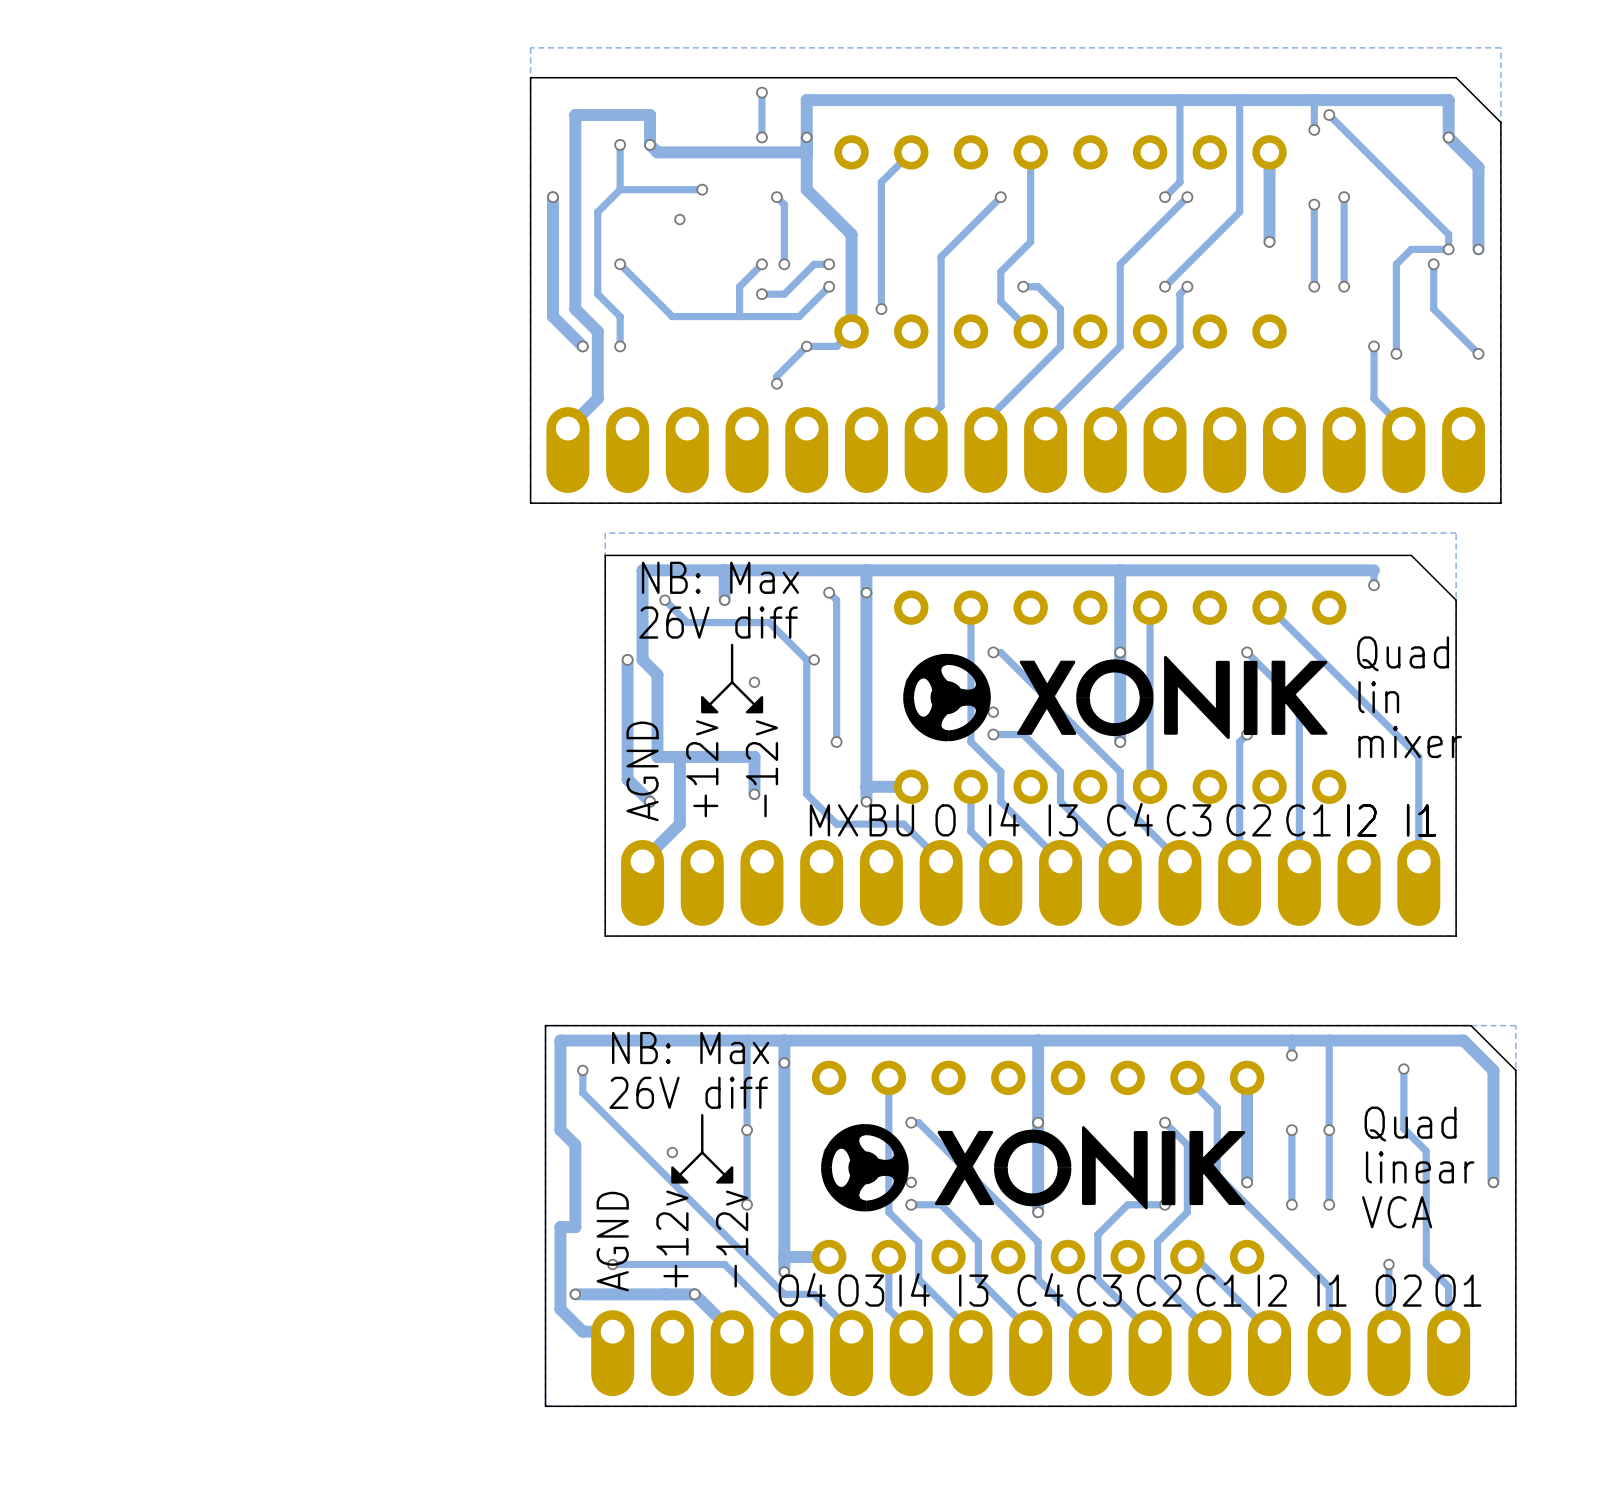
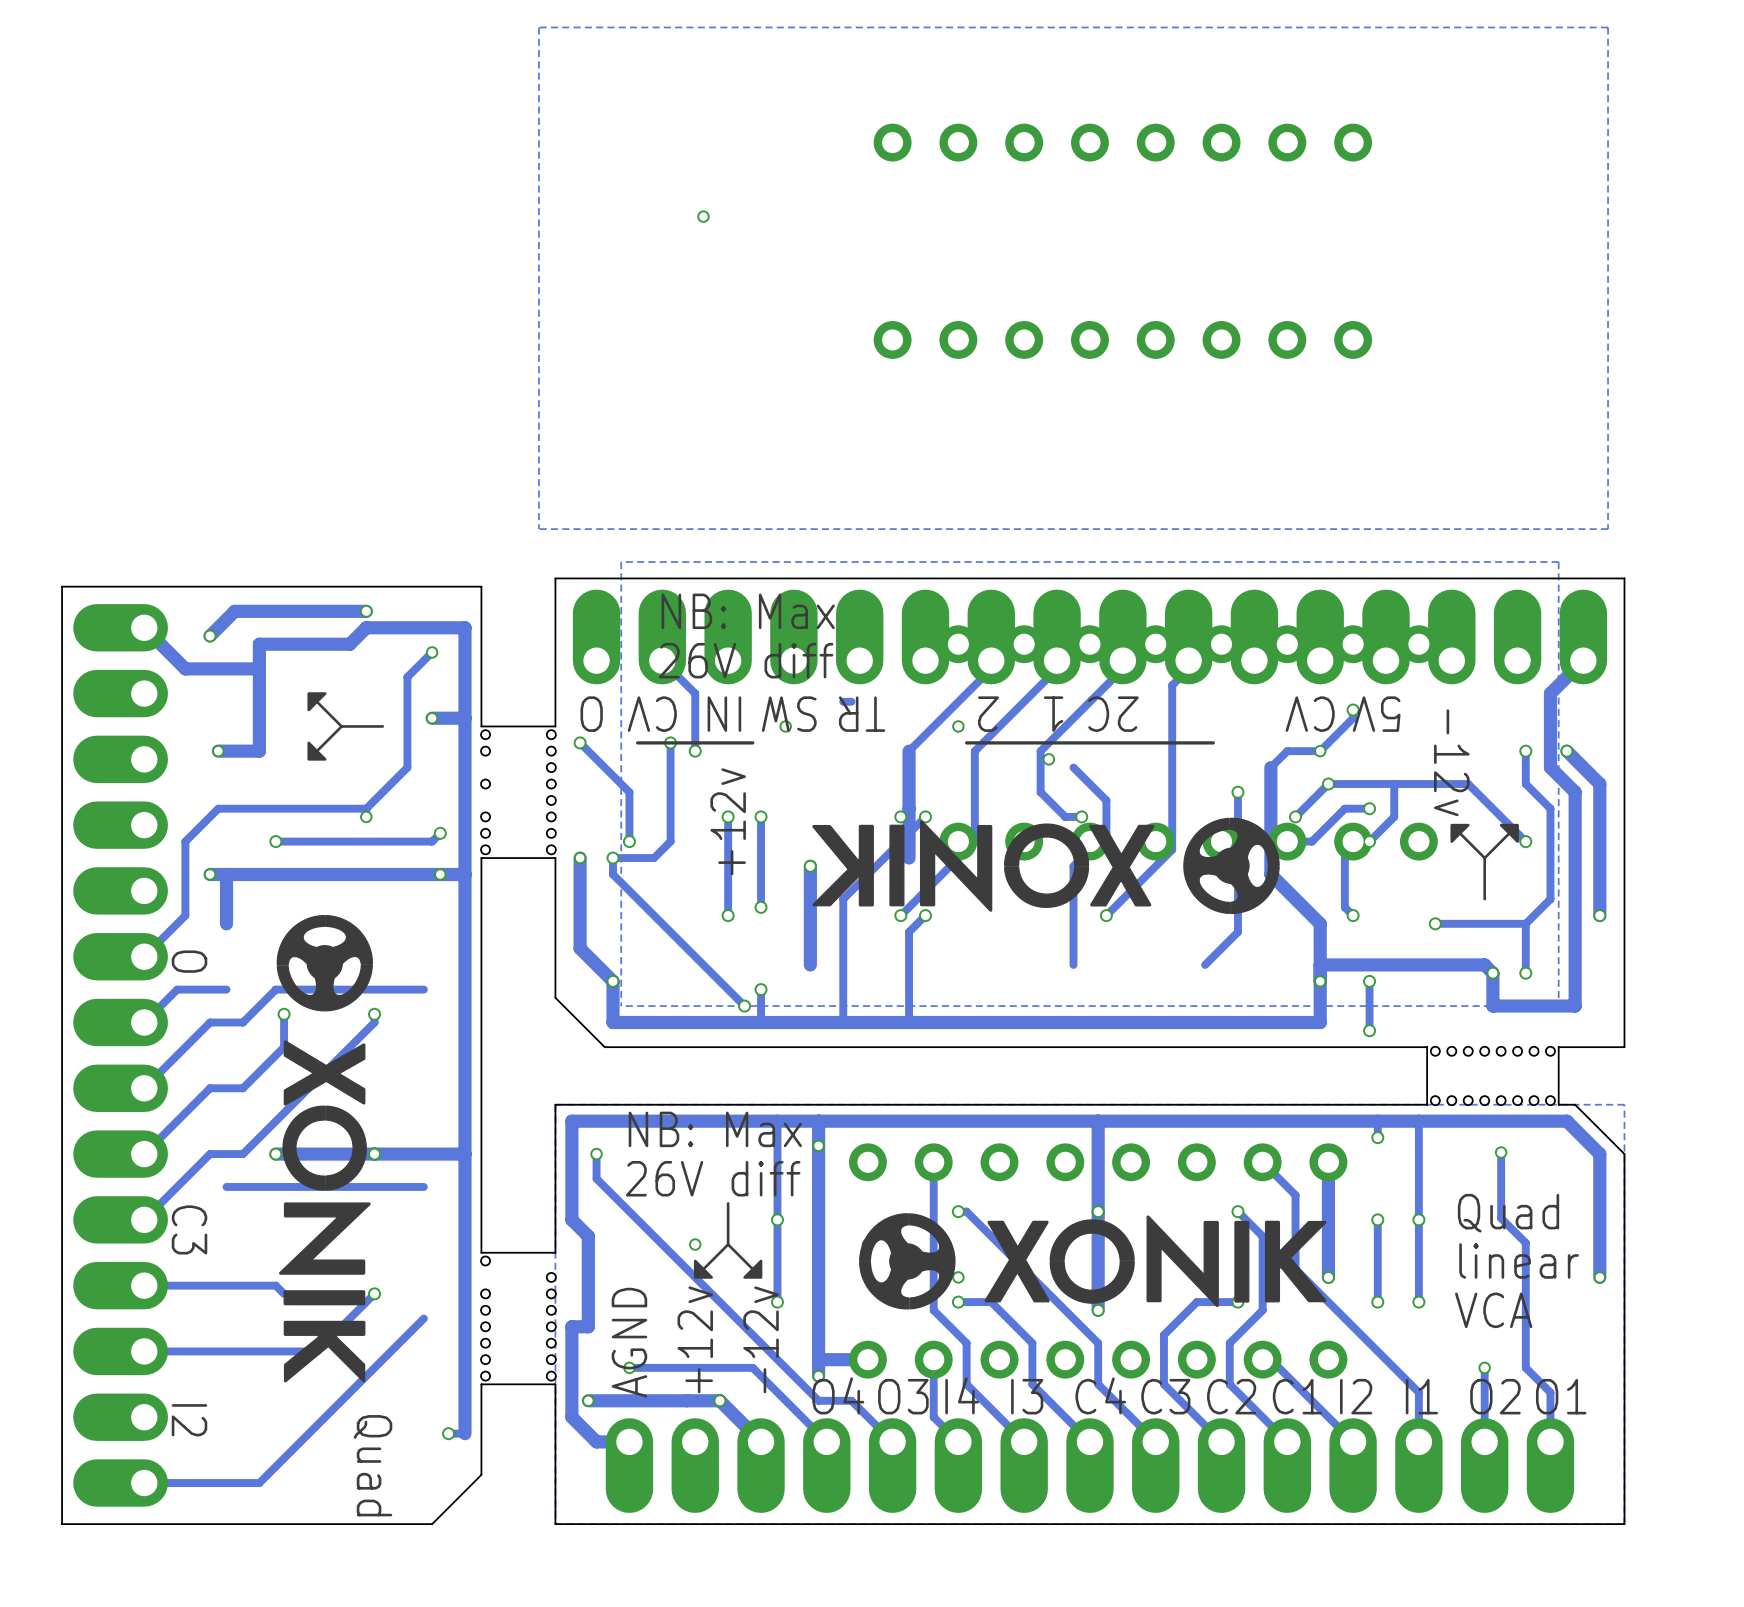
board edge: (1456, 77) (530, 77) (530, 503) (1500, 503) (1500, 122) (1456, 77) -> none
track: (761, 92) (761, 137) -> none
via: (761, 92) -> none
track: (1179, 100) (1179, 182) (1165, 197) -> none
track: (1239, 100) (1239, 212) (1165, 286) -> none
track: (1314, 100) (1314, 129) -> none
track: (1329, 115) (1448, 234) (1448, 249) (1411, 249) (1396, 264) (1396, 353) -> none
via: (1329, 115) -> none
via: (1314, 129) -> none
via: (761, 137) -> none
via: (806, 137) -> none
via: (1448, 137) -> none
track: (620, 144) (620, 189) -> none
via: (620, 144) -> none
via: (650, 144) -> none
track: (806, 152) (657, 152) (650, 144) (650, 115) (575, 115) (575, 309) (597, 331) (597, 398) (567, 428) -> none
track: (911, 152) (881, 182) (881, 309) -> none
track: (1030, 152) (1030, 241) (1000, 271) (1000, 301) (1030, 331) -> none
track: (1269, 152) (1269, 241) -> none
track: (620, 189) (597, 212) (597, 294) (620, 316) (620, 346) -> none
track: (702, 189) (620, 189) -> none
via: (702, 189) -> none
track: (552, 197) (552, 316) (582, 346) -> none
via: (552, 197) -> none
track: (776, 197) (784, 204) (784, 264) -> none
via: (776, 197) -> none
track: (1000, 197) (941, 256) (941, 406) (926, 421) (926, 428) -> none
via: (1000, 197) -> none
via: (1165, 197) -> none
track: (1187, 197) (1120, 264) (1120, 346) (1045, 421) (1045, 428) -> none
via: (1187, 197) -> none
track: (1344, 197) (1344, 286) -> none
via: (1344, 197) -> none
track: (1314, 204) (1314, 286) -> none
via: (1314, 204) -> none
via: (1269, 241) -> none
via: (1448, 249) -> none
track: (1478, 249) (1478, 167) (1448, 137) (1448, 100) (806, 100) (806, 189) (851, 234) (851, 331) (836, 346) (806, 346) (776, 376) (776, 383) -> none
via: (1478, 249) -> none
track: (620, 264) (672, 316) (799, 316) (829, 286) -> none
via: (620, 264) -> none
track: (761, 264) (739, 286) (739, 316) -> none
via: (761, 264) -> none
via: (784, 264) -> none
track: (829, 264) (814, 264) (784, 294) (761, 294) -> none
via: (829, 264) -> none
track: (1433, 264) (1433, 309) (1478, 353) -> none
via: (1433, 264) -> none
via: (829, 286) -> none
track: (1023, 286) (1038, 286) (1060, 309) (1060, 346) (985, 421) (985, 428) -> none
via: (1023, 286) -> none
via: (1165, 286) -> none
track: (1187, 286) (1179, 294) (1179, 346) (1105, 421) (1105, 428) -> none
via: (1187, 286) -> none
via: (1314, 286) -> none
via: (1344, 286) -> none
via: (761, 294) -> none
via: (881, 309) -> none
via: (582, 346) -> none
via: (620, 346) -> none
via: (806, 346) -> none
track: (1374, 346) (1374, 398) (1403, 428) -> none
via: (1374, 346) -> none
via: (1396, 353) -> none
via: (1478, 353) -> none
via: (776, 383) -> none
part: (567, 450) -> none
part: (627, 450) -> none
part: (687, 450) -> none
part: (747, 450) -> none
part: (806, 450) -> none
part: (866, 450) -> none
part: (926, 450) -> none
part: (985, 450) -> none
part: (1045, 450) -> none
part: (1105, 450) -> none
part: (1165, 450) -> none
part: (1224, 450) -> none
part: (1284, 450) -> none
part: (1344, 450) -> none
part: (1403, 450) -> none
part: (1463, 450) -> none
board edge: (1411, 555) (605, 555) (605, 936) (1456, 936) (1456, 600) (1411, 555) -> none
track: (724, 570) (724, 600) -> (761, 989) (761, 1022)
track: (866, 570) (866, 704) -> (991, 660) (991, 668) (909, 751)
track: (1120, 570) (1120, 622) -> none
track: none -> (366, 611) (234, 611) (210, 636)
via: none -> (366, 611)
track: (1374, 585) (1374, 570) (642, 570) (642, 659) (657, 674) (657, 756) (754, 756) (754, 794) -> none
via: (1374, 585) -> none
part: none -> (120, 627)
track: none -> (144, 627) (185, 668) (259, 668)
track: (829, 592) (836, 600) (836, 742) -> none
via: (829, 592) -> none
via: (866, 592) -> none
via: none -> (210, 636)
track: (664, 600) (687, 622) (769, 622) (806, 659) (806, 794) (836, 824) (903, 824) (941, 861) -> none
via: (664, 600) -> none
via: (724, 600) -> none
part: none -> (596, 636)
part: none -> (662, 636)
part: none -> (728, 636)
part: none -> (793, 636)
part: none -> (859, 636)
part: none -> (925, 636)
part: none -> (991, 636)
part: none -> (1057, 636)
part: none -> (1122, 636)
part: none -> (1188, 636)
part: none -> (1254, 636)
part: none -> (1320, 636)
part: none -> (1386, 636)
part: none -> (1451, 636)
part: none -> (1517, 636)
part: none -> (1583, 636)
track: (970, 607) (970, 742) (1000, 771) (1000, 801) (1060, 861) -> none
track: (1150, 607) (1150, 786) -> none
track: (1269, 607) (1418, 756) (1418, 861) -> none
track: none -> (432, 652) (407, 677) (407, 767) (366, 808)
via: none -> (432, 652)
track: none -> (662, 660) (695, 693) (695, 751)
track: none -> (1057, 660) (1057, 668) (974, 751) (974, 841) (900, 915)
track: none -> (1122, 660) (1122, 668) (1040, 751) (1040, 792) (1065, 816) (1081, 816)
track: none -> (1583, 660) (1550, 693) (1550, 767) (1575, 792) (1575, 1006) (1492, 1006) (1492, 973) (1484, 964) (1320, 964)
track: (1120, 630) (1120, 742) -> (1188, 668) (1172, 685) (1172, 849) (1106, 915)
line: (732, 644) (732, 682) -> none
drawing: none -> [307, 692, 327, 712]
part: none -> (120, 693)
track: (993, 652) (1000, 652) (1120, 771) (1120, 801) (1179, 861) -> none
via: (993, 652) -> none
via: (1120, 652) -> none
track: (1247, 652) (1299, 704) (1299, 861) -> none
via position: (1247, 652) -> (1353, 710)
drawing: [903, 653, 1328, 742] -> none
text: Quad (1403, 653) -> none
track: (627, 659) (627, 779) (650, 801) -> none
via: (627, 659) -> none
via: (814, 659) -> none
track: none -> (1353, 710) (1353, 718) (1320, 751) (1287, 751) (1270, 767) (1270, 874) (1320, 923) (1320, 1022) (613, 1022) (613, 981) (580, 948) (580, 858)
text: none -> O (591, 714)
text: none -> CV (652, 714)
text: none -> IN (724, 714)
text: none -> SW (789, 714)
text: none -> TR (862, 714)
text: none -> 2 (988, 714)
text: none -> 1 (1053, 714)
text: none -> 2C (1113, 714)
text: none -> CV (1310, 714)
text: none -> 5V (1376, 714)
via: none -> (432, 718)
track: none -> (464, 718) (432, 718)
line: none -> (382, 726) (341, 726)
line: (732, 682) (709, 704) -> (341, 726) (316, 751)
line: (732, 682) (754, 704) -> (316, 701) (341, 726)
hole: none -> (485, 734)
hole: none -> (551, 734)
drawing: [745, 696, 764, 714] -> none
track: none -> (580, 742) (629, 792) (629, 841)
via: none -> (580, 742)
track: none -> (670, 742) (670, 841) (654, 858) (613, 858) (613, 874) (744, 1006)
via: none -> (670, 742)
line: none -> (752, 742) (637, 742)
line: none -> (1213, 742) (966, 742)
text: lin (1378, 697) -> none
track: none -> (218, 751) (259, 751) (259, 644) (349, 644) (366, 627) (464, 627) (464, 1433) (448, 1433)
via: none -> (218, 751)
hole: none -> (485, 751)
hole: none -> (551, 751)
via: none -> (695, 751)
drawing position: (709, 704) -> (316, 751)
via: none -> (1320, 751)
track: none -> (1525, 751) (1525, 784) (1550, 808) (1550, 899) (1525, 923)
via: none -> (1525, 751)
track: none -> (1566, 751) (1599, 784) (1599, 915)
via: none -> (1566, 751)
part: none -> (120, 759)
hole: none -> (551, 767)
track: none -> (1073, 767) (1106, 800) (1106, 833) (1073, 866) (1073, 964)
hole: none -> (485, 784)
hole: none -> (551, 784)
track: (993, 734) (1023, 734) (1060, 771) (1060, 801) (1120, 861) -> none
via position: (993, 734) -> (1081, 816)
track: none -> (1328, 784) (1468, 784) (1525, 841)
track: none -> (1394, 784) (1394, 816) (1369, 841)
via: (836, 742) -> none
via position: (1120, 742) -> (1237, 792)
track: none -> (1237, 792) (1237, 932) (1205, 964)
track: (1239, 742) (1239, 861) -> (1320, 792) (1295, 816)
text: mixer (1410, 742) -> none
hole: none -> (551, 800)
track: none -> (366, 808) (218, 808) (185, 841) (185, 915) (144, 956)
track: (679, 756) (679, 824) (642, 861) -> none
track: none -> (1369, 808) (1344, 808) (1311, 841) (1295, 841)
via: none -> (1369, 808)
via: none -> (366, 816)
hole: none -> (485, 816)
hole: none -> (551, 816)
track: none -> (728, 816) (728, 915)
via: none -> (728, 816)
track: none -> (761, 816) (761, 907)
via: none -> (761, 816)
via: none -> (900, 816)
track: none -> (925, 816) (843, 899) (843, 1022)
via: none -> (925, 816)
via: none -> (1295, 816)
drawing: none -> [812, 817, 1280, 915]
text rotation: 0° (761, 768) -> 180° (1451, 762)
text position: -12v (761, 768) -> -12v (1451, 762)
drawing: none -> [1450, 823, 1519, 843]
part: none -> (120, 825)
text: AGND (642, 771) -> none
track: none -> (440, 833) (432, 841) (275, 841)
via: none -> (440, 833)
hole: none -> (485, 833)
hole: none -> (551, 833)
line: none -> (1460, 833) (1484, 858)
line: none -> (1509, 833) (1484, 858)
via: none -> (275, 841)
via: none -> (629, 841)
track: (911, 786) (866, 786) -> none
track: (970, 786) (970, 831) (1000, 861) -> none
track: none -> (1344, 841) (1344, 907) (1353, 915)
via: none -> (1369, 841)
via: none -> (1525, 841)
hole: none -> (485, 849)
hole: none -> (551, 849)
via: (754, 794) -> none
via: none -> (580, 858)
via: none -> (613, 858)
via: (650, 801) -> none
via: (866, 801) -> none
line: none -> (1484, 858) (1484, 899)
track: none -> (810, 866) (810, 964)
via: none -> (810, 866)
via: none -> (210, 874)
track: none -> (226, 874) (226, 923)
via: none -> (440, 874)
track: none -> (464, 874) (210, 874)
text: I4 (1004, 819) -> none
text: C4 (1130, 819) -> none
text: MX (834, 820) -> none
text: BU (891, 820) -> none
text: O (945, 820) -> none
text: I3 (1063, 820) -> none
text: C3 (1189, 820) -> none
text: C2 (1248, 820) -> none
text: C1 (1308, 820) -> none
text: I2 (1361, 820) -> none
text: I1 (1421, 820) -> none
part: none -> (120, 890)
via: none -> (761, 907)
drawing: none -> [276, 914, 374, 1383]
via: none -> (728, 915)
via: none -> (900, 915)
track: none -> (925, 915) (909, 932) (909, 1022)
via: none -> (925, 915)
via: none -> (1106, 915)
via: none -> (1353, 915)
via: none -> (1599, 915)
via: none -> (1435, 923)
track: none -> (1525, 923) (1525, 973)
track: none -> (1525, 923) (1435, 923)
part: (642, 882) -> none
part: (702, 882) -> none
part: (761, 882) -> none
part: (821, 882) -> none
part: (881, 882) -> none
part: (941, 882) -> none
part: (1000, 882) -> none
part: (1060, 882) -> none
part: (1120, 882) -> none
part: (1179, 882) -> none
part: (1239, 882) -> none
part: (1299, 882) -> none
part: (1359, 882) -> none
part: (1418, 882) -> none
part: none -> (120, 956)
text: none -> O (189, 961)
via: none -> (1492, 973)
via: none -> (1525, 973)
via: none -> (613, 981)
via: none -> (1320, 981)
track: none -> (1369, 981) (1369, 1030)
via: none -> (1369, 981)
track: none -> (226, 989) (177, 989) (144, 1022)
track: none -> (423, 989) (275, 989) (242, 1022) (210, 1022) (144, 1088)
via: none -> (761, 989)
via: none -> (744, 1006)
track: none -> (284, 1014) (284, 1047) (242, 1088) (210, 1088) (144, 1154)
via: none -> (284, 1014)
track: none -> (374, 1014) (374, 1022) (242, 1154) (210, 1154) (144, 1219)
via: none -> (374, 1014)
part: none -> (120, 1022)
via: none -> (1369, 1030)
hole: none -> (1435, 1051)
hole: none -> (1451, 1051)
hole: none -> (1468, 1051)
hole: none -> (1484, 1051)
hole: none -> (1501, 1051)
hole: none -> (1517, 1051)
hole: none -> (1534, 1051)
hole: none -> (1550, 1051)
part: none -> (120, 1088)
hole: none -> (1435, 1100)
hole: none -> (1451, 1100)
hole: none -> (1468, 1100)
hole: none -> (1484, 1100)
hole: none -> (1501, 1100)
hole: none -> (1517, 1100)
hole: none -> (1534, 1100)
hole: none -> (1550, 1100)
board edge: (1456, 1025) (1336, 1025) -> (1558, 1104) (1558, 1047) (1624, 1047) (1624, 578) (555, 578) (555, 726) (481, 726) (481, 586) (62, 586) (62, 1524) (432, 1524) (481, 1474) (481, 1384) (555, 1384)
part: none -> (120, 1154)
via: none -> (275, 1154)
via: none -> (374, 1154)
track: none -> (464, 1154) (275, 1154)
track: none -> (423, 1186) (226, 1186)
part: none -> (120, 1219)
text: none -> C3 (189, 1229)
board edge: (545, 1159) (545, 1279) -> (555, 1252) (481, 1252) (481, 858) (555, 858) (555, 997) (604, 1047) (1427, 1047) (1427, 1104)
hole: none -> (485, 1260)
hole: none -> (551, 1277)
part: none -> (120, 1285)
track: none -> (144, 1285) (275, 1285) (284, 1293)
track: none -> (374, 1293) (316, 1351) (144, 1351)
via: none -> (374, 1293)
hole: none -> (485, 1293)
hole: none -> (551, 1293)
hole: none -> (485, 1310)
hole: none -> (551, 1310)
track: none -> (423, 1318) (259, 1483) (144, 1483)
hole: none -> (485, 1326)
hole: none -> (551, 1326)
hole: none -> (485, 1343)
hole: none -> (551, 1343)
part: none -> (120, 1351)
hole: none -> (485, 1359)
hole: none -> (551, 1359)
hole: none -> (485, 1376)
hole: none -> (551, 1376)
part: none -> (120, 1417)
text: none -> I2 (189, 1420)
via: none -> (448, 1433)
text: none -> Quad (372, 1465)
part: none -> (120, 1483)

